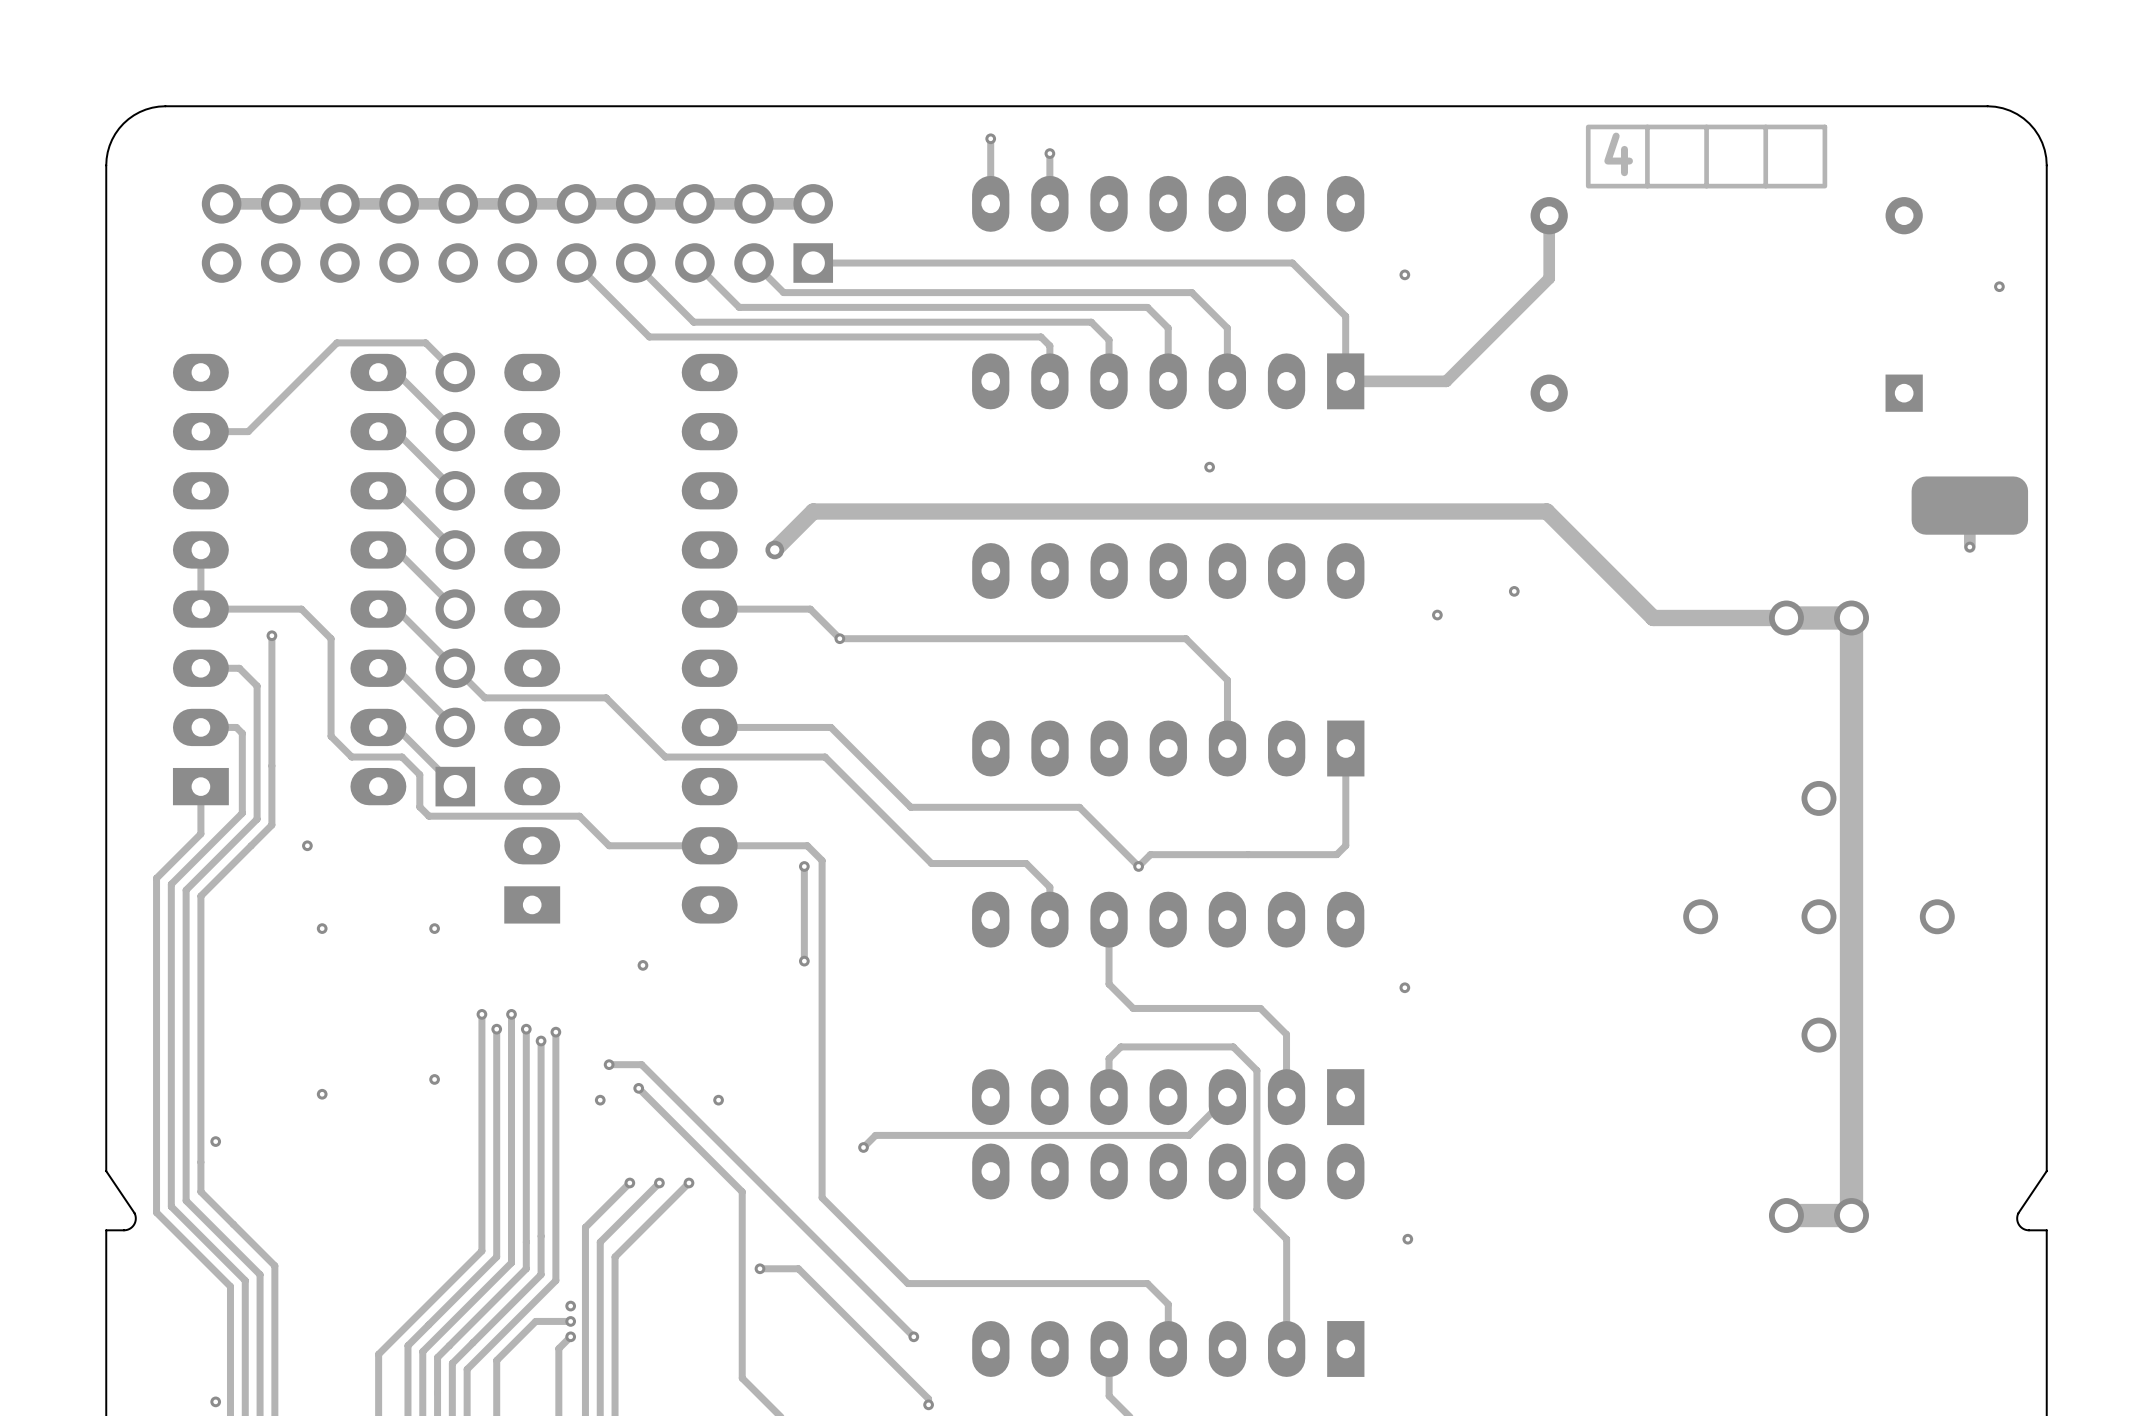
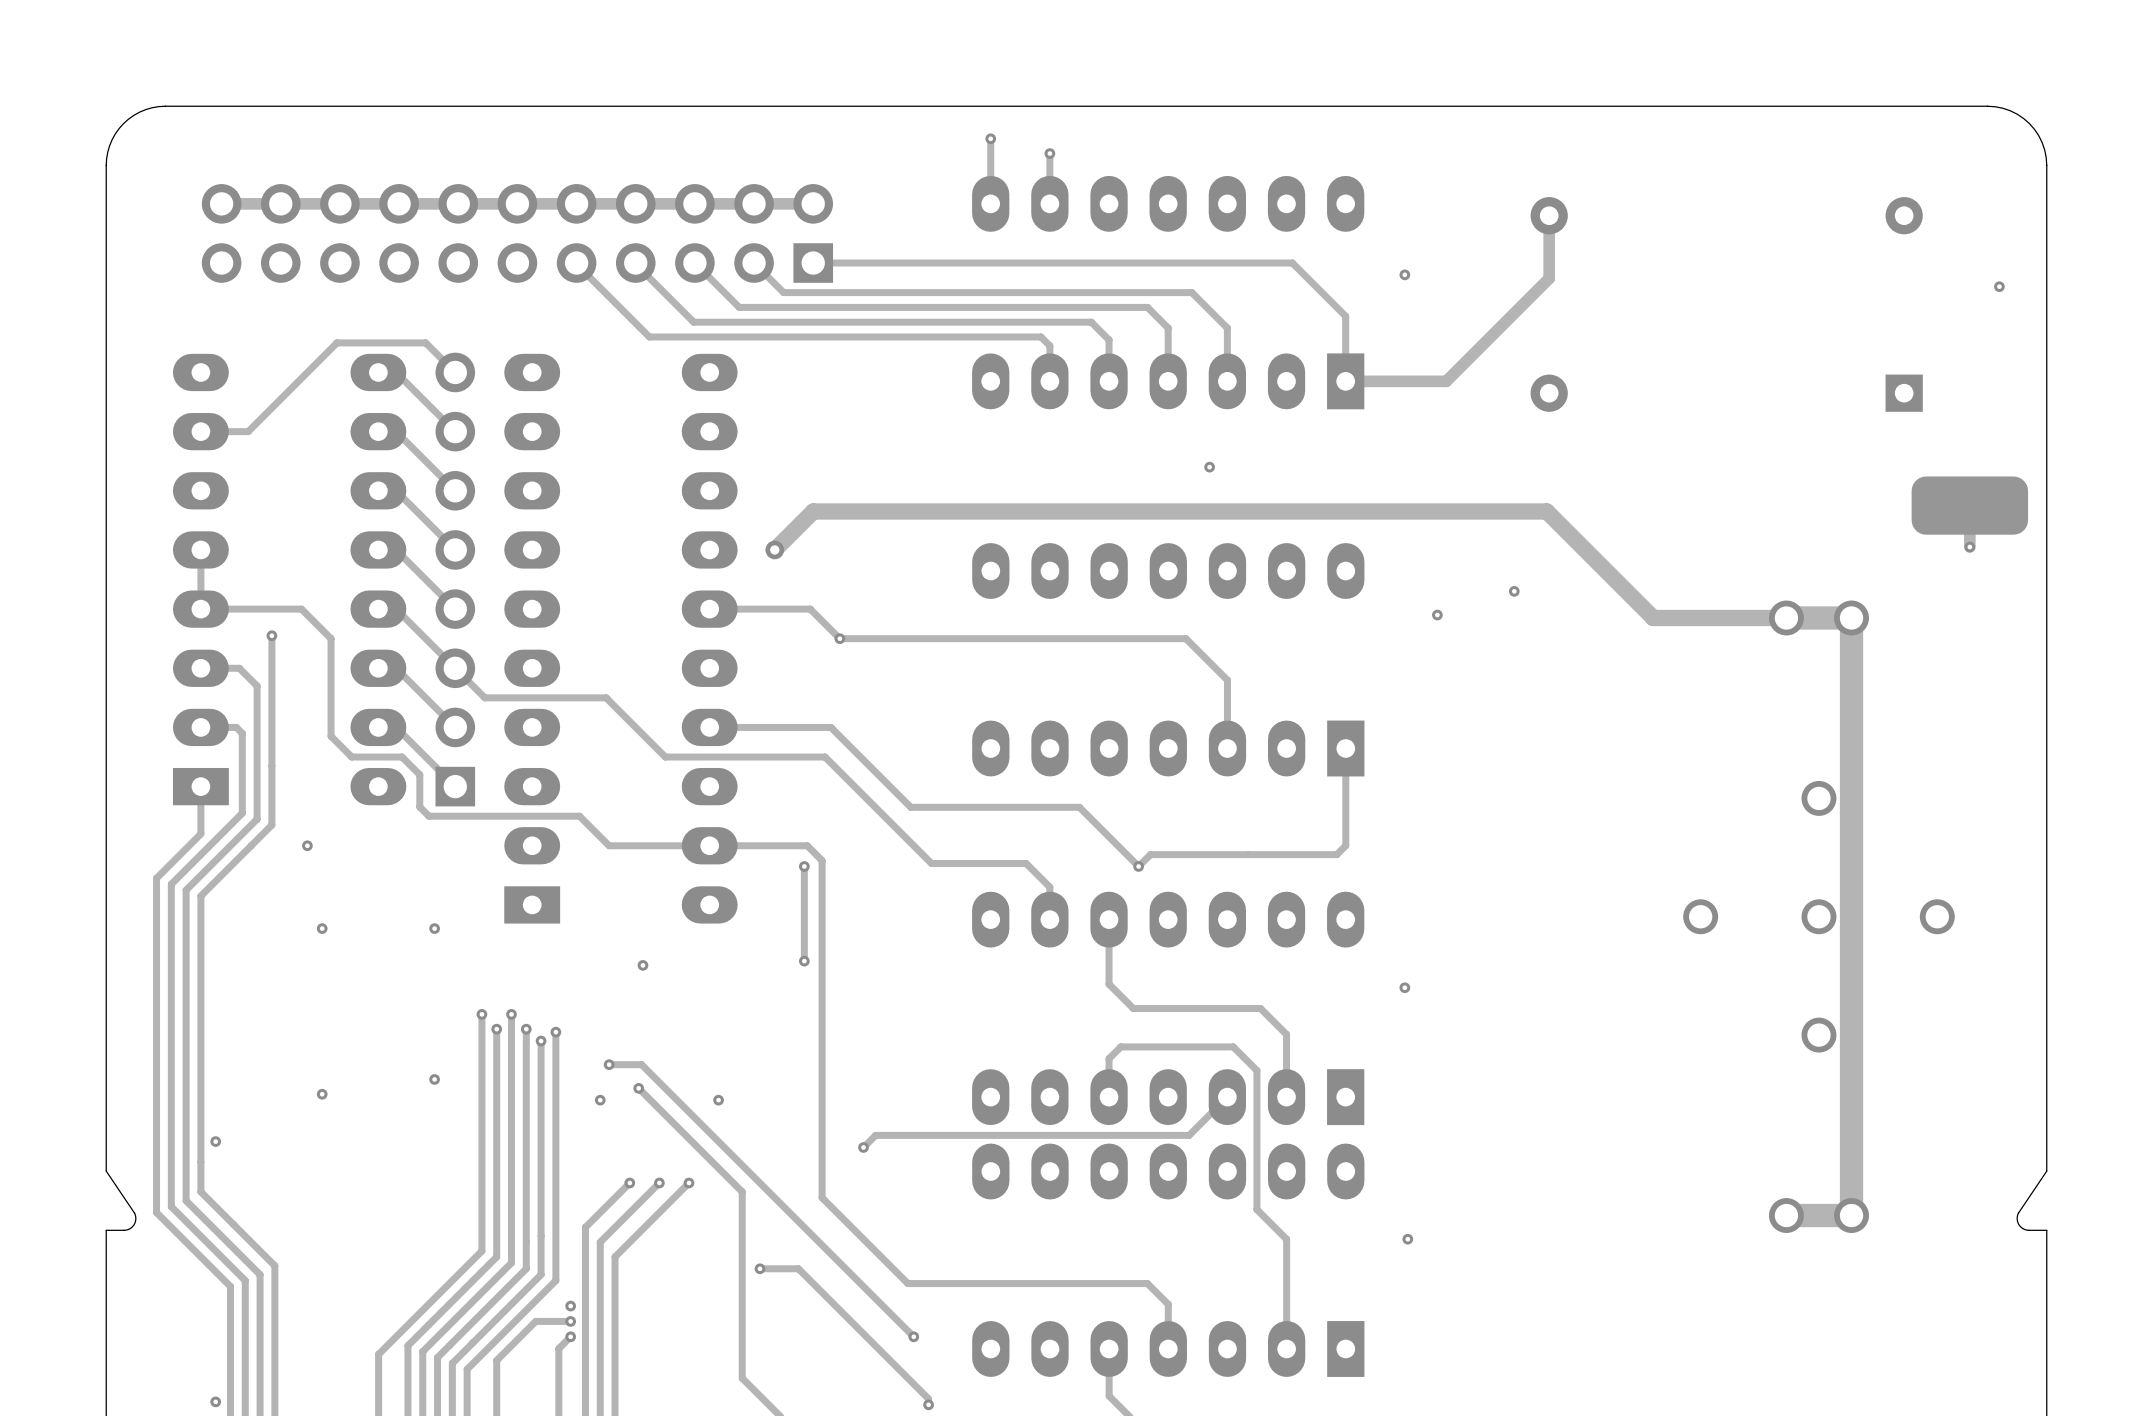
drawing: [1585, 124, 1828, 189] -> none

